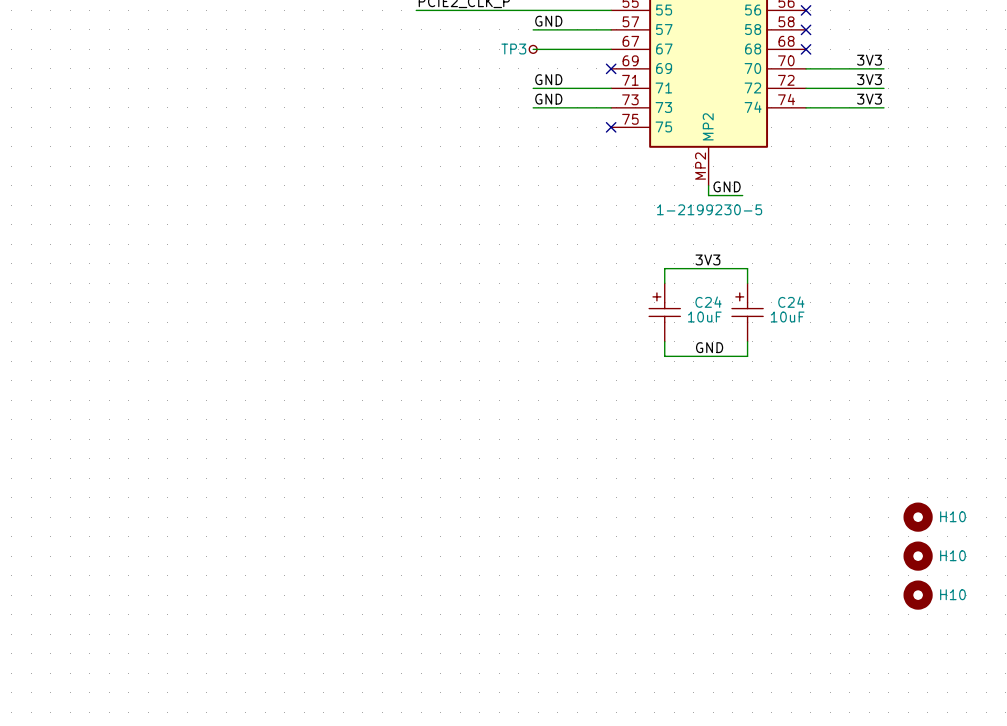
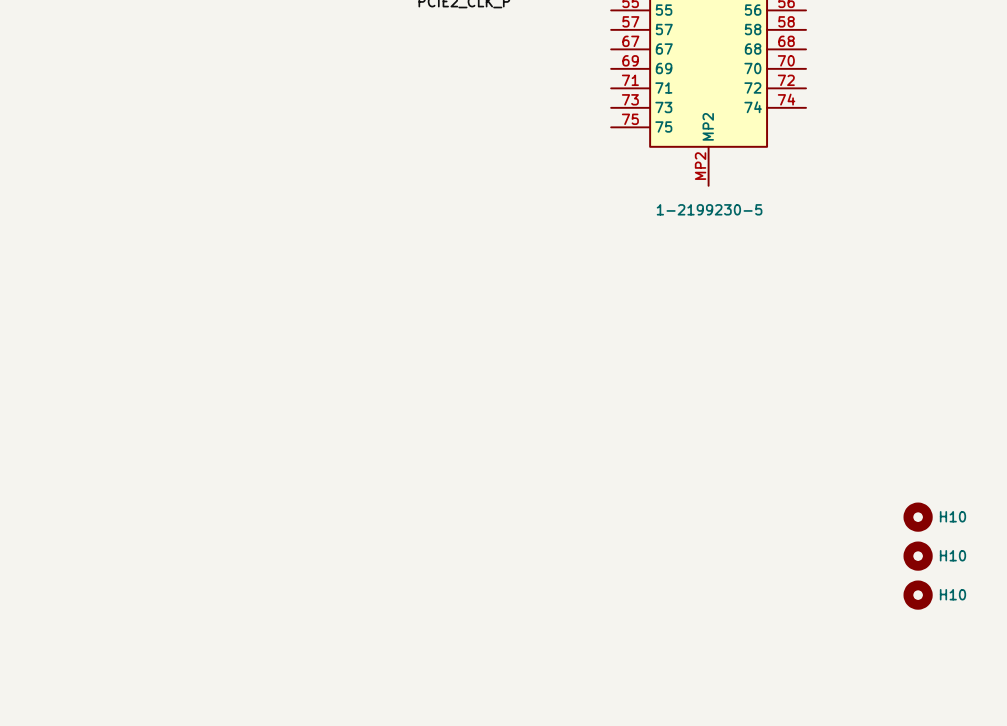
wire: (416, 10) (611, 10) -> none
no-connect mark: (806, 10) -> none
label: GND (548, 21) -> none
wire: (533, 29) (611, 29) -> none
no-connect mark: (806, 29) -> none
wire: (533, 49) (611, 49) -> none
TP3: (533, 49) -> none
no-connect mark: (806, 49) -> none
label: 3V3 (869, 60) -> none
no-connect mark: (611, 68) -> none
wire: (806, 68) (883, 68) -> none
label: GND (548, 79) -> none
label: 3V3 (869, 79) -> none
wire: (533, 88) (611, 88) -> none
wire: (806, 88) (883, 88) -> none
label: GND (548, 99) -> none
label: 3V3 (869, 99) -> none
wire: (533, 107) (611, 107) -> none
wire: (806, 107) (883, 107) -> none
no-connect mark: (611, 127) -> none
wire: (708, 185) (708, 195) (742, 195) -> none
label: GND (727, 186) -> none
label: 3V3 (707, 259) -> none
wire: (664, 283) (664, 268) (747, 268) (747, 283) -> none
C24: 10uF (664, 312) -> none
C24: 10uF (747, 312) -> none
wire: (664, 341) (664, 356) (747, 356) (747, 341) -> none
label: GND (709, 347) -> none

